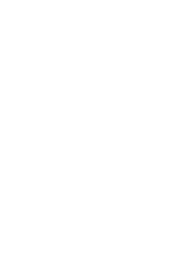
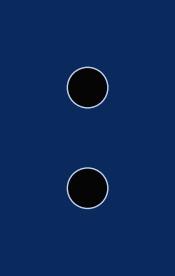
part: none -> (87, 87)
part: none -> (87, 188)

